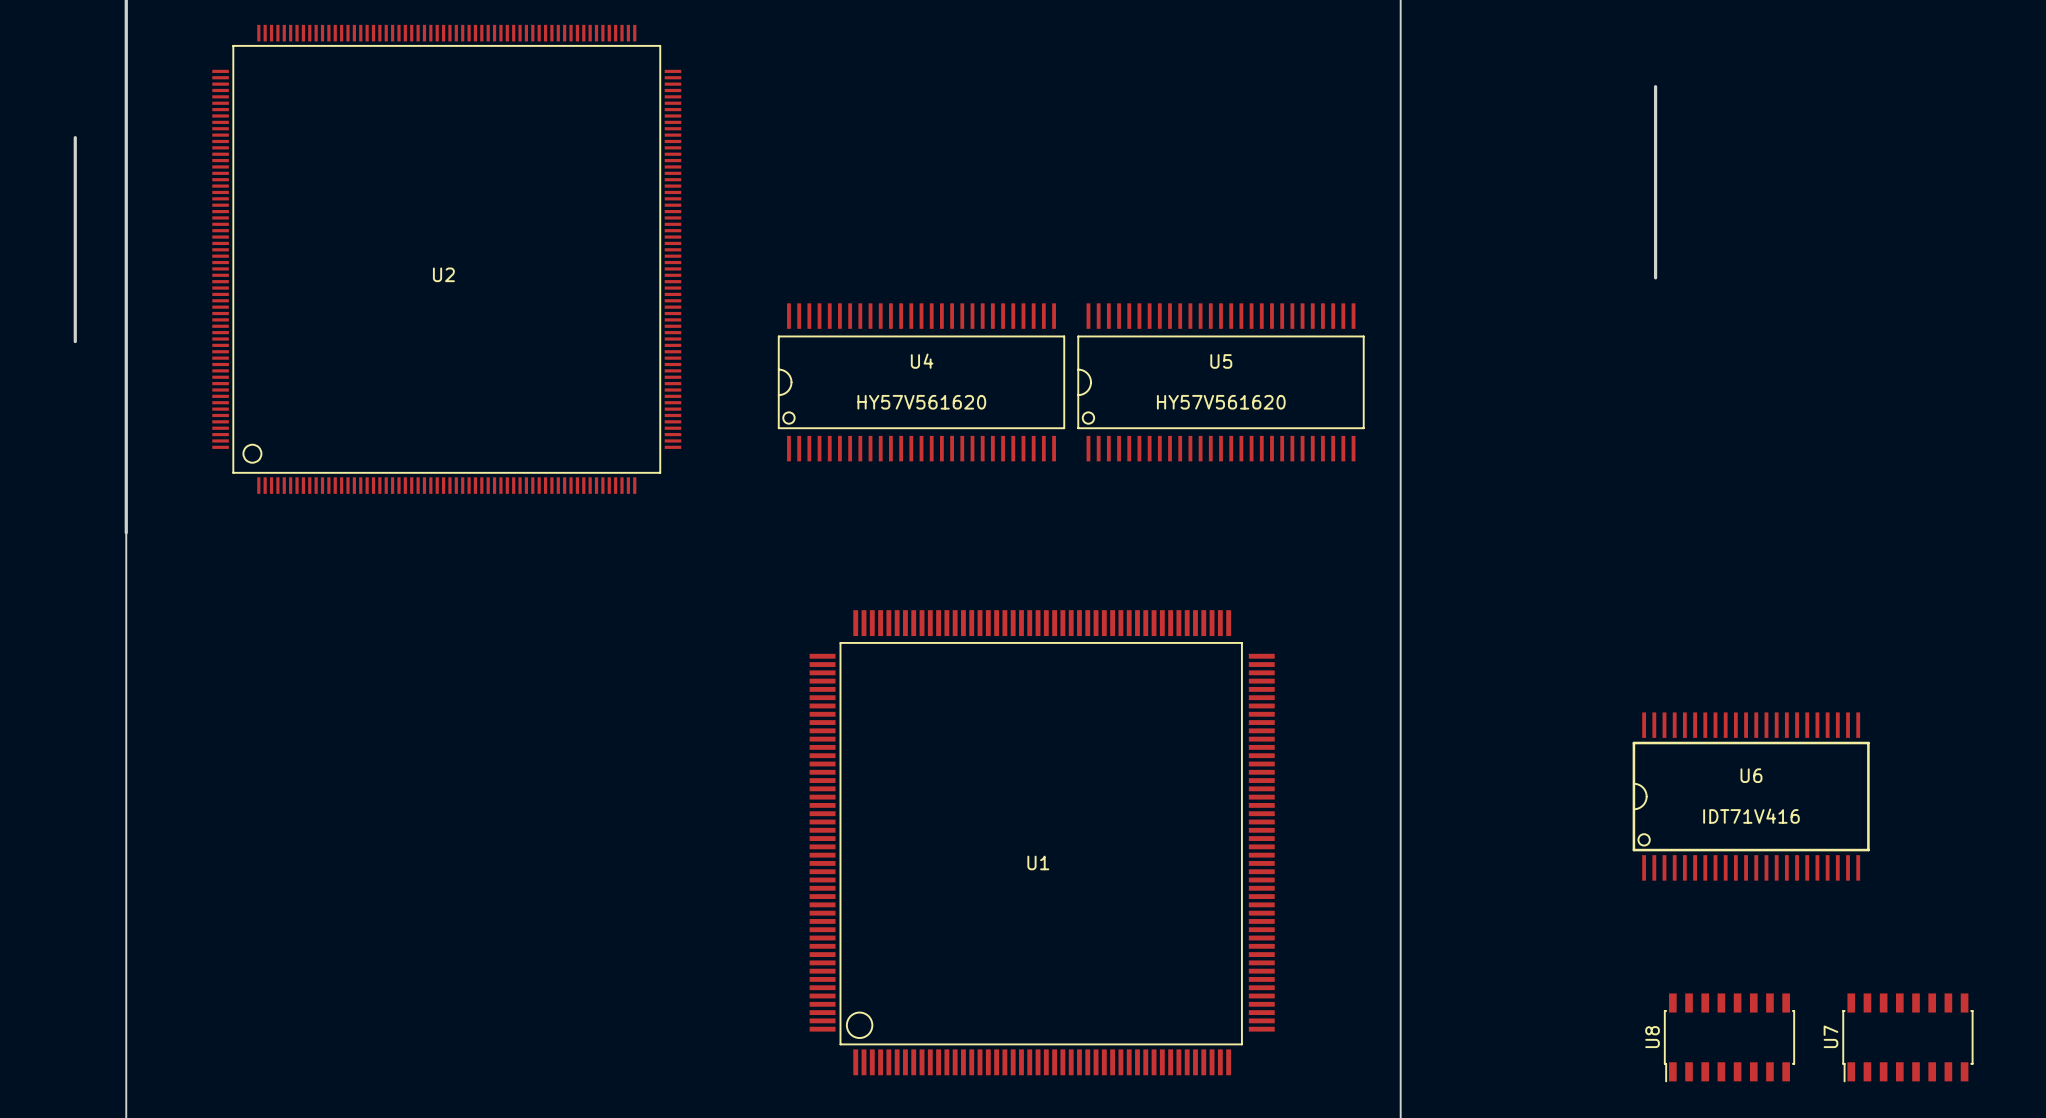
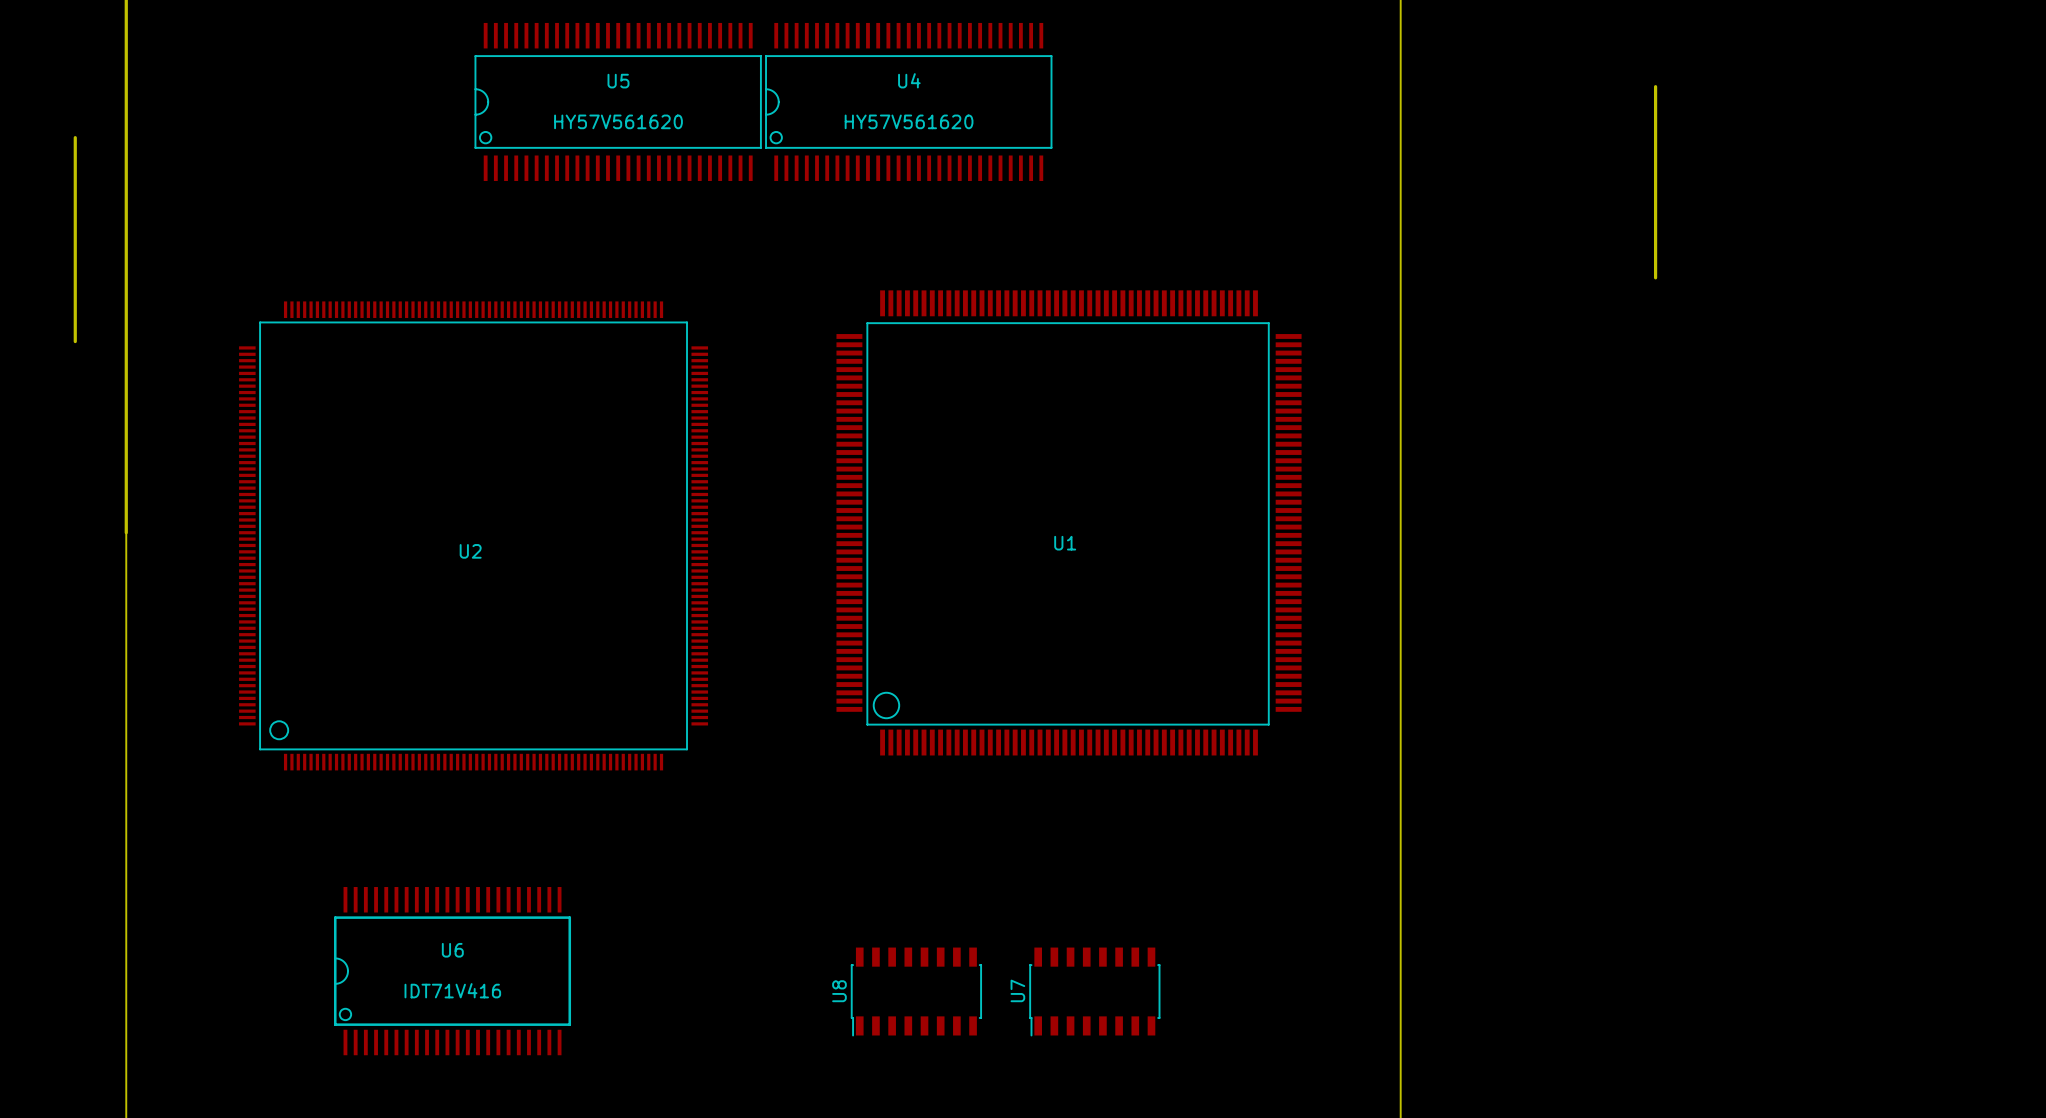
U2 position: (446, 259) -> (473, 535)
U4 position: (921, 382) -> (908, 101)
U5 position: (1220, 382) -> (618, 101)
U6 position: (1751, 796) -> (452, 971)
U1 position: (1042, 842) -> (1069, 522)
U8 position: (1729, 1037) -> (916, 992)
U7 position: (1907, 1037) -> (1094, 992)

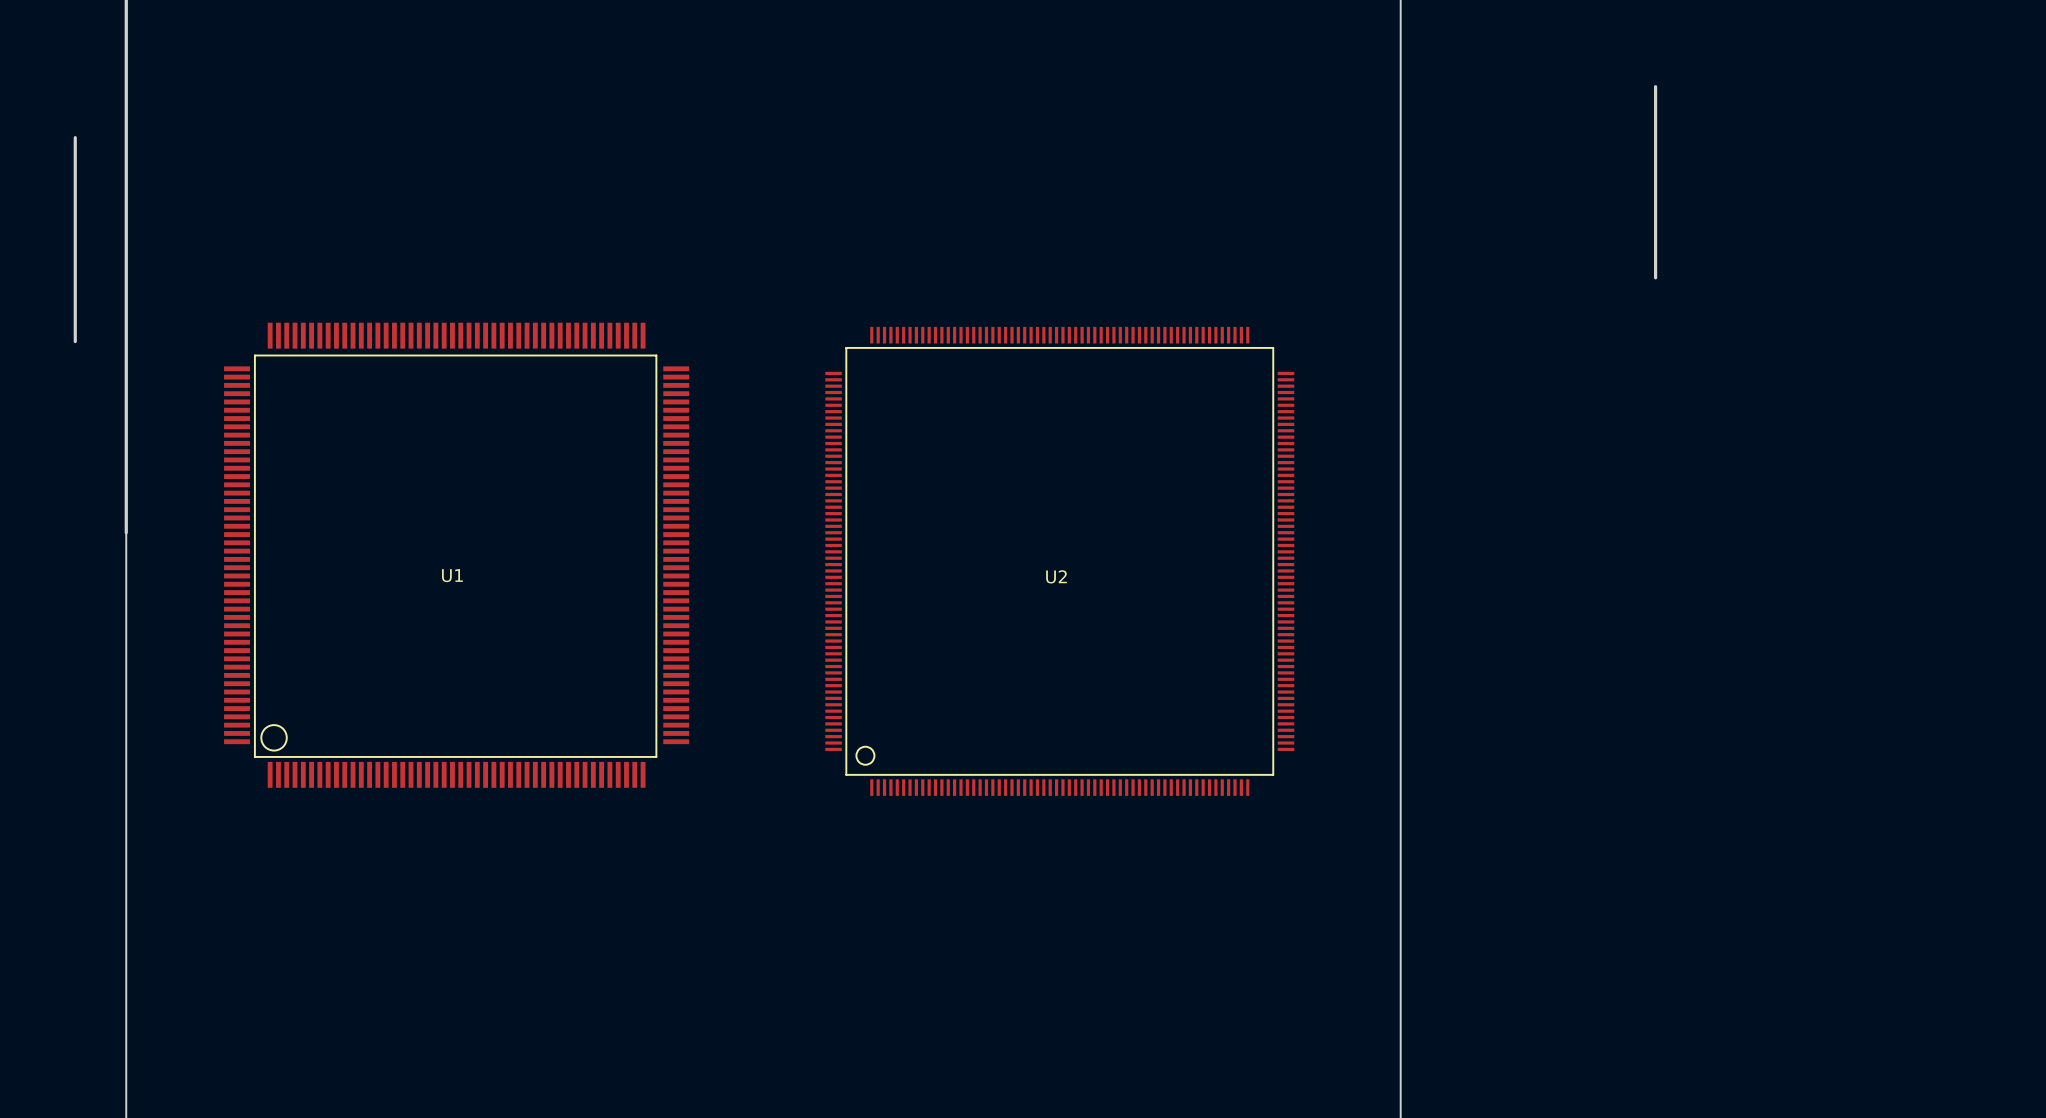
U5: HY57V561620 (618, 101) -> none
U4: HY57V561620 (908, 101) -> none
U1 position: (1069, 522) -> (456, 555)
U2 position: (473, 535) -> (1059, 561)
U6: IDT71V416 (452, 971) -> none
U8: (916, 992) -> none
U7: (1094, 992) -> none

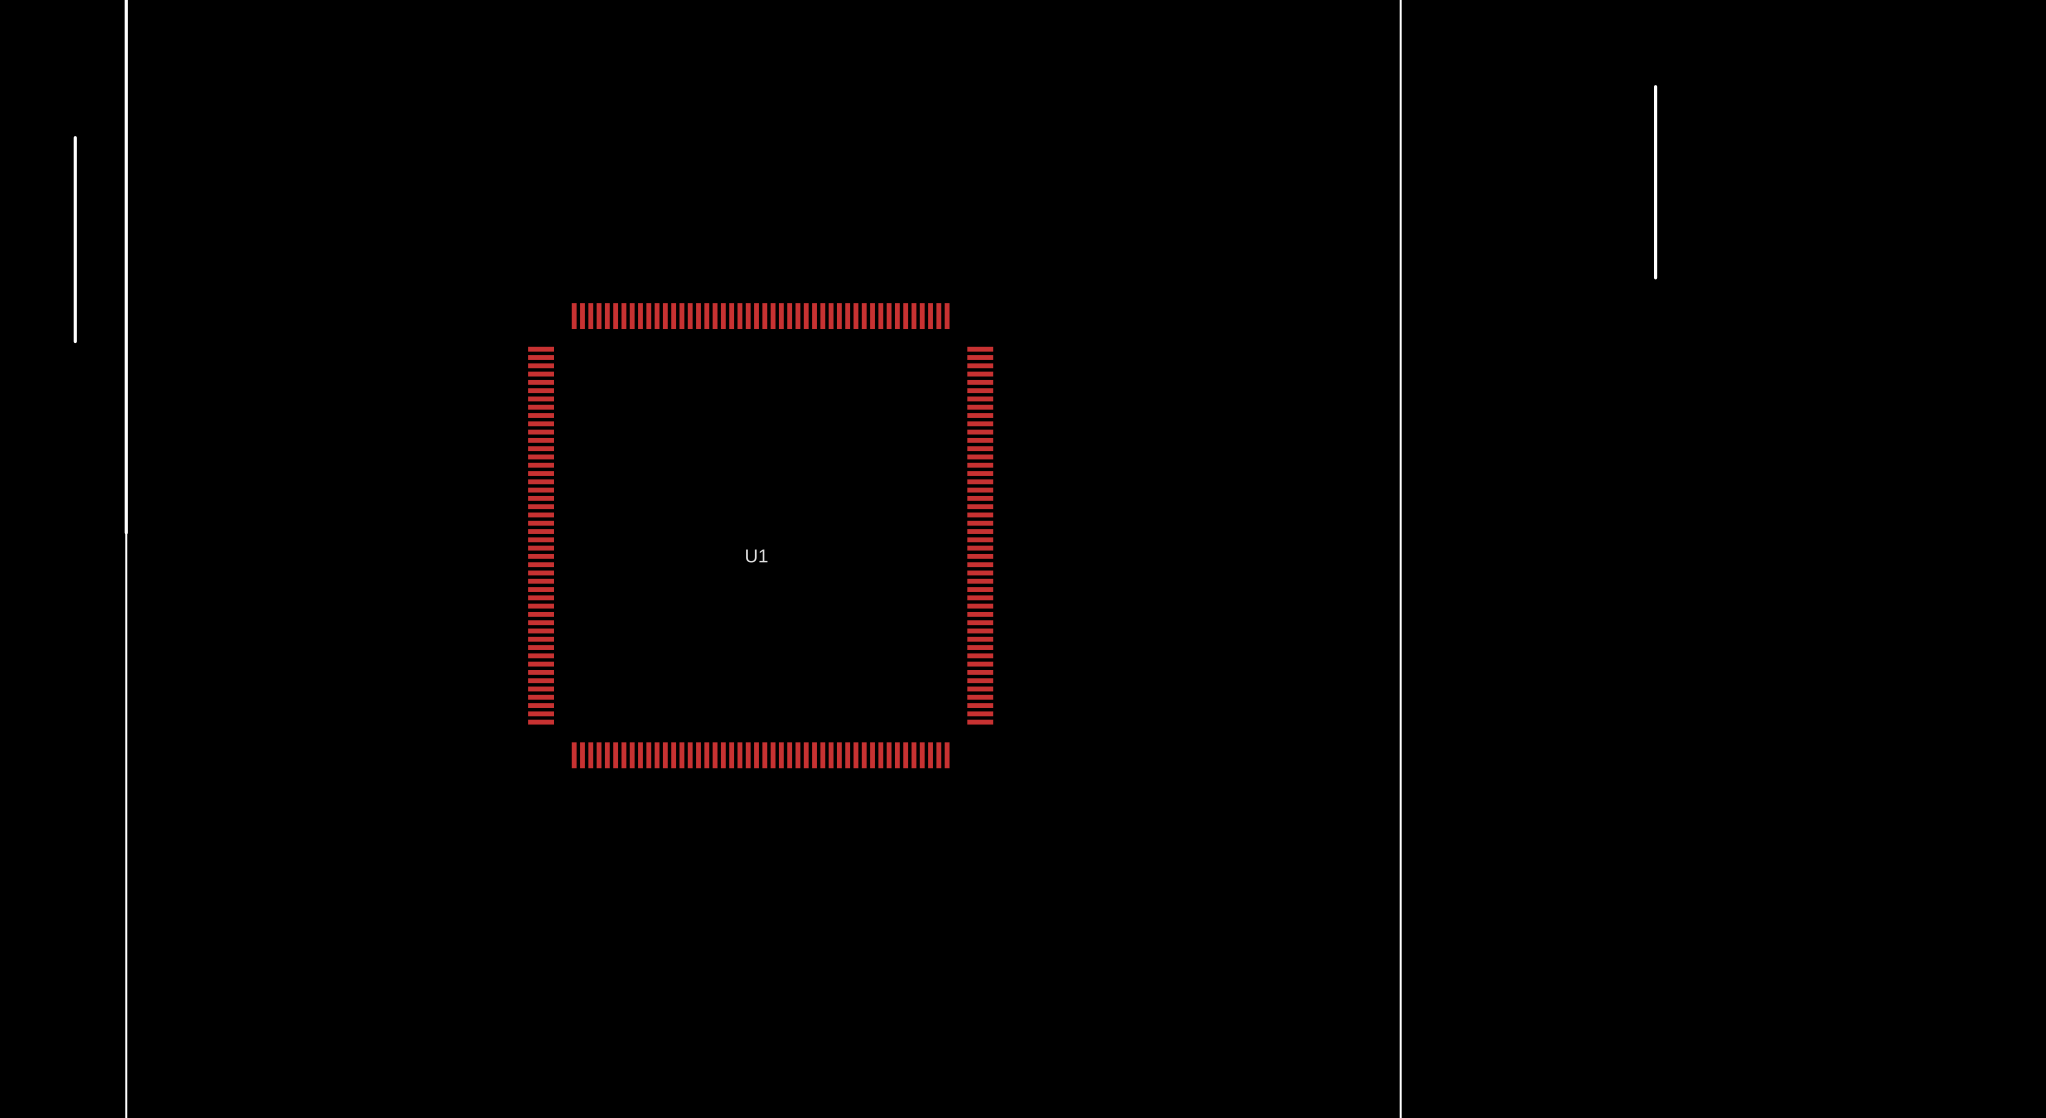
U1 footprint: [224, 322, 690, 788] -> [528, 303, 994, 769]
U2: (1059, 561) -> none

